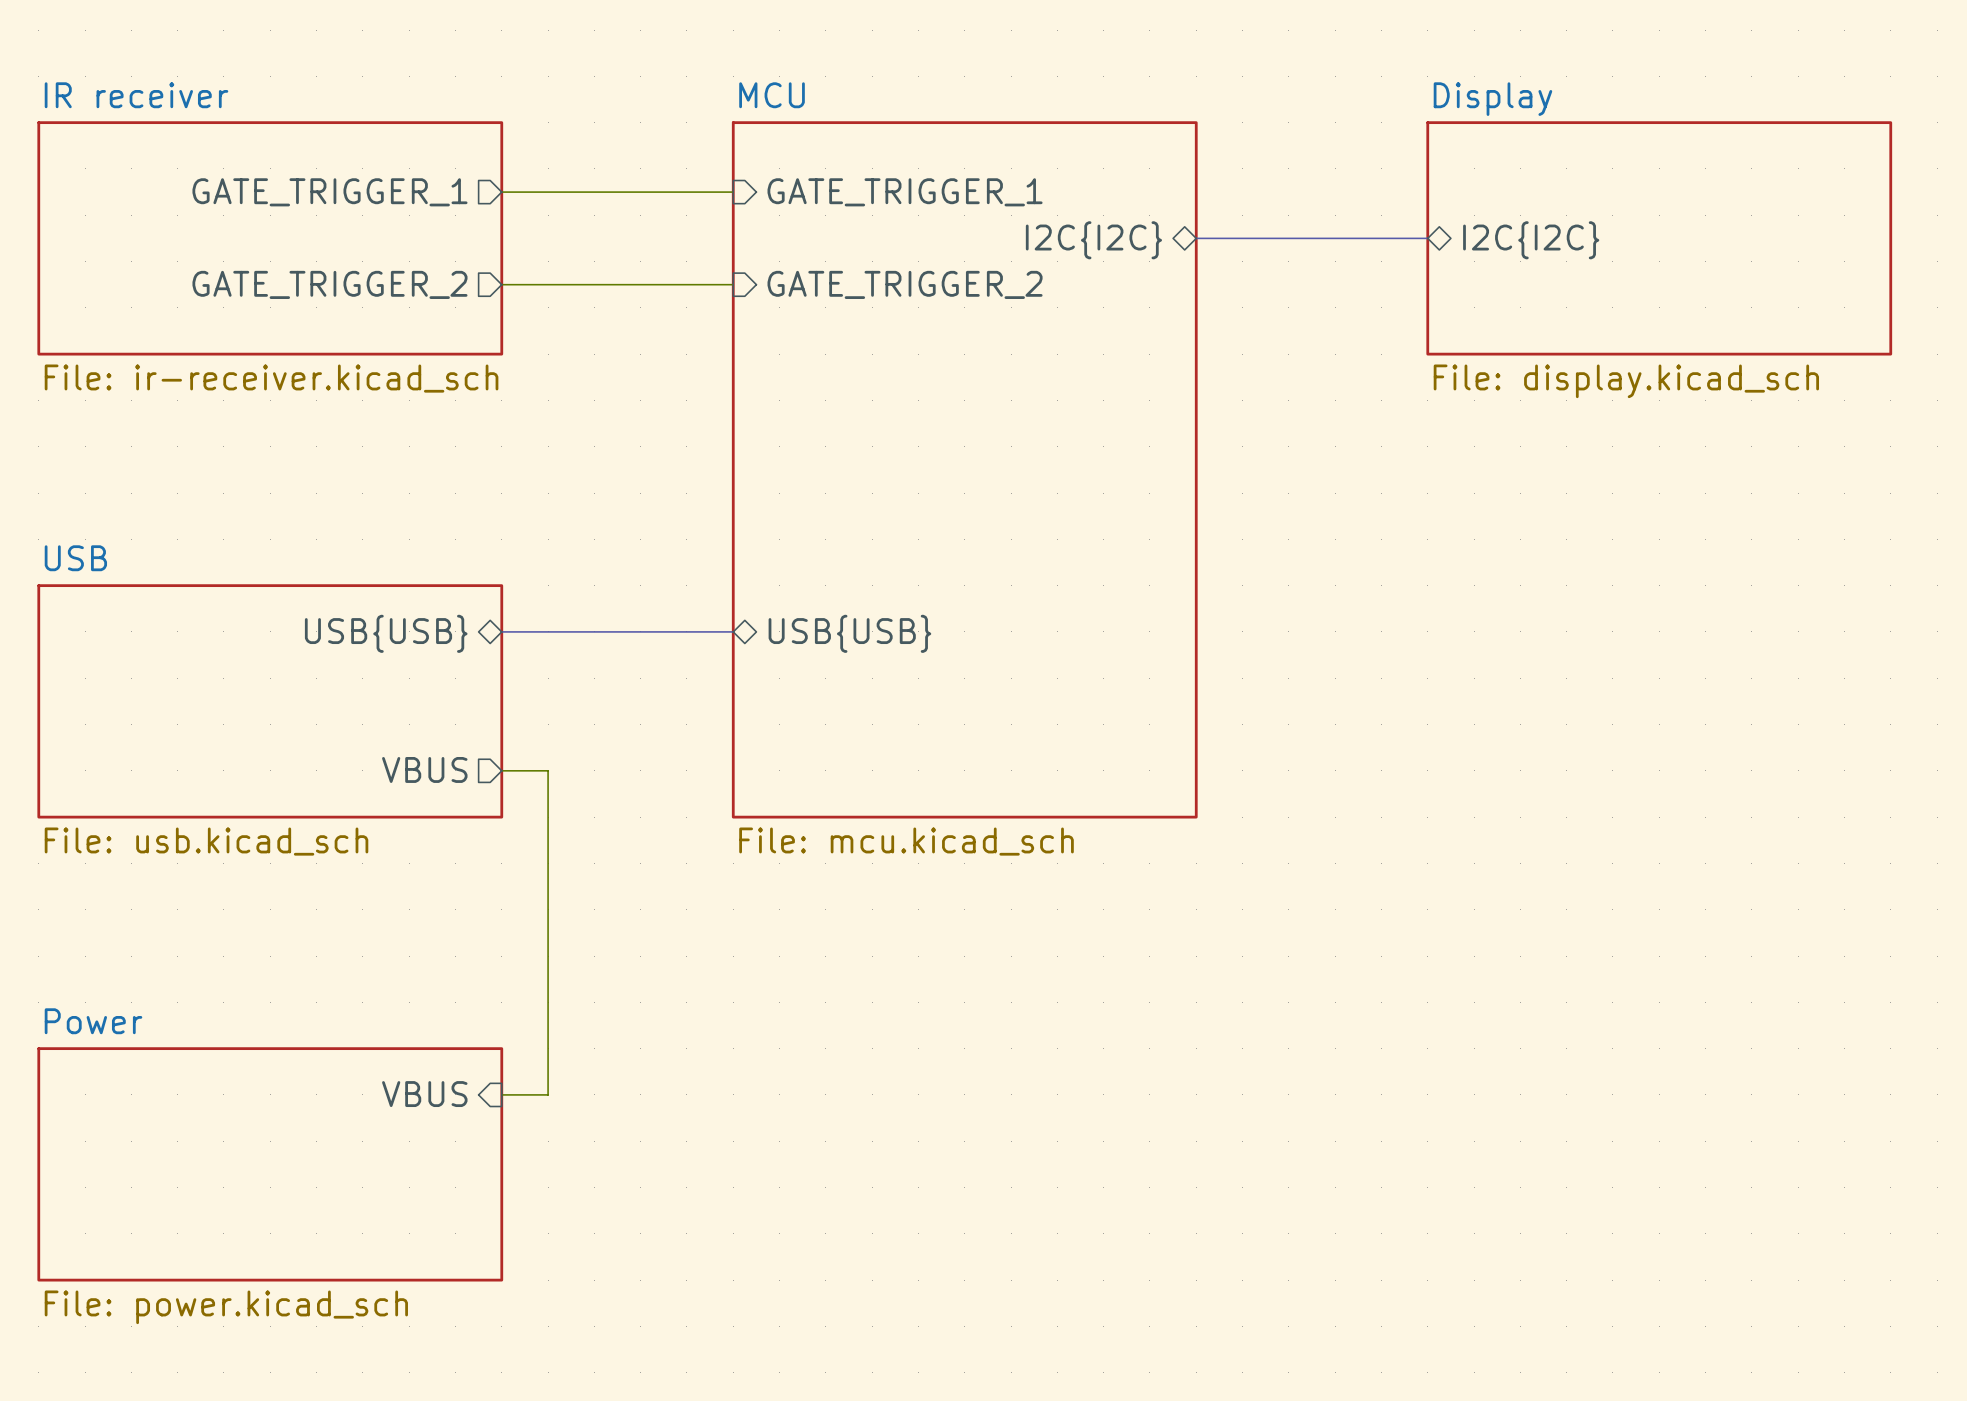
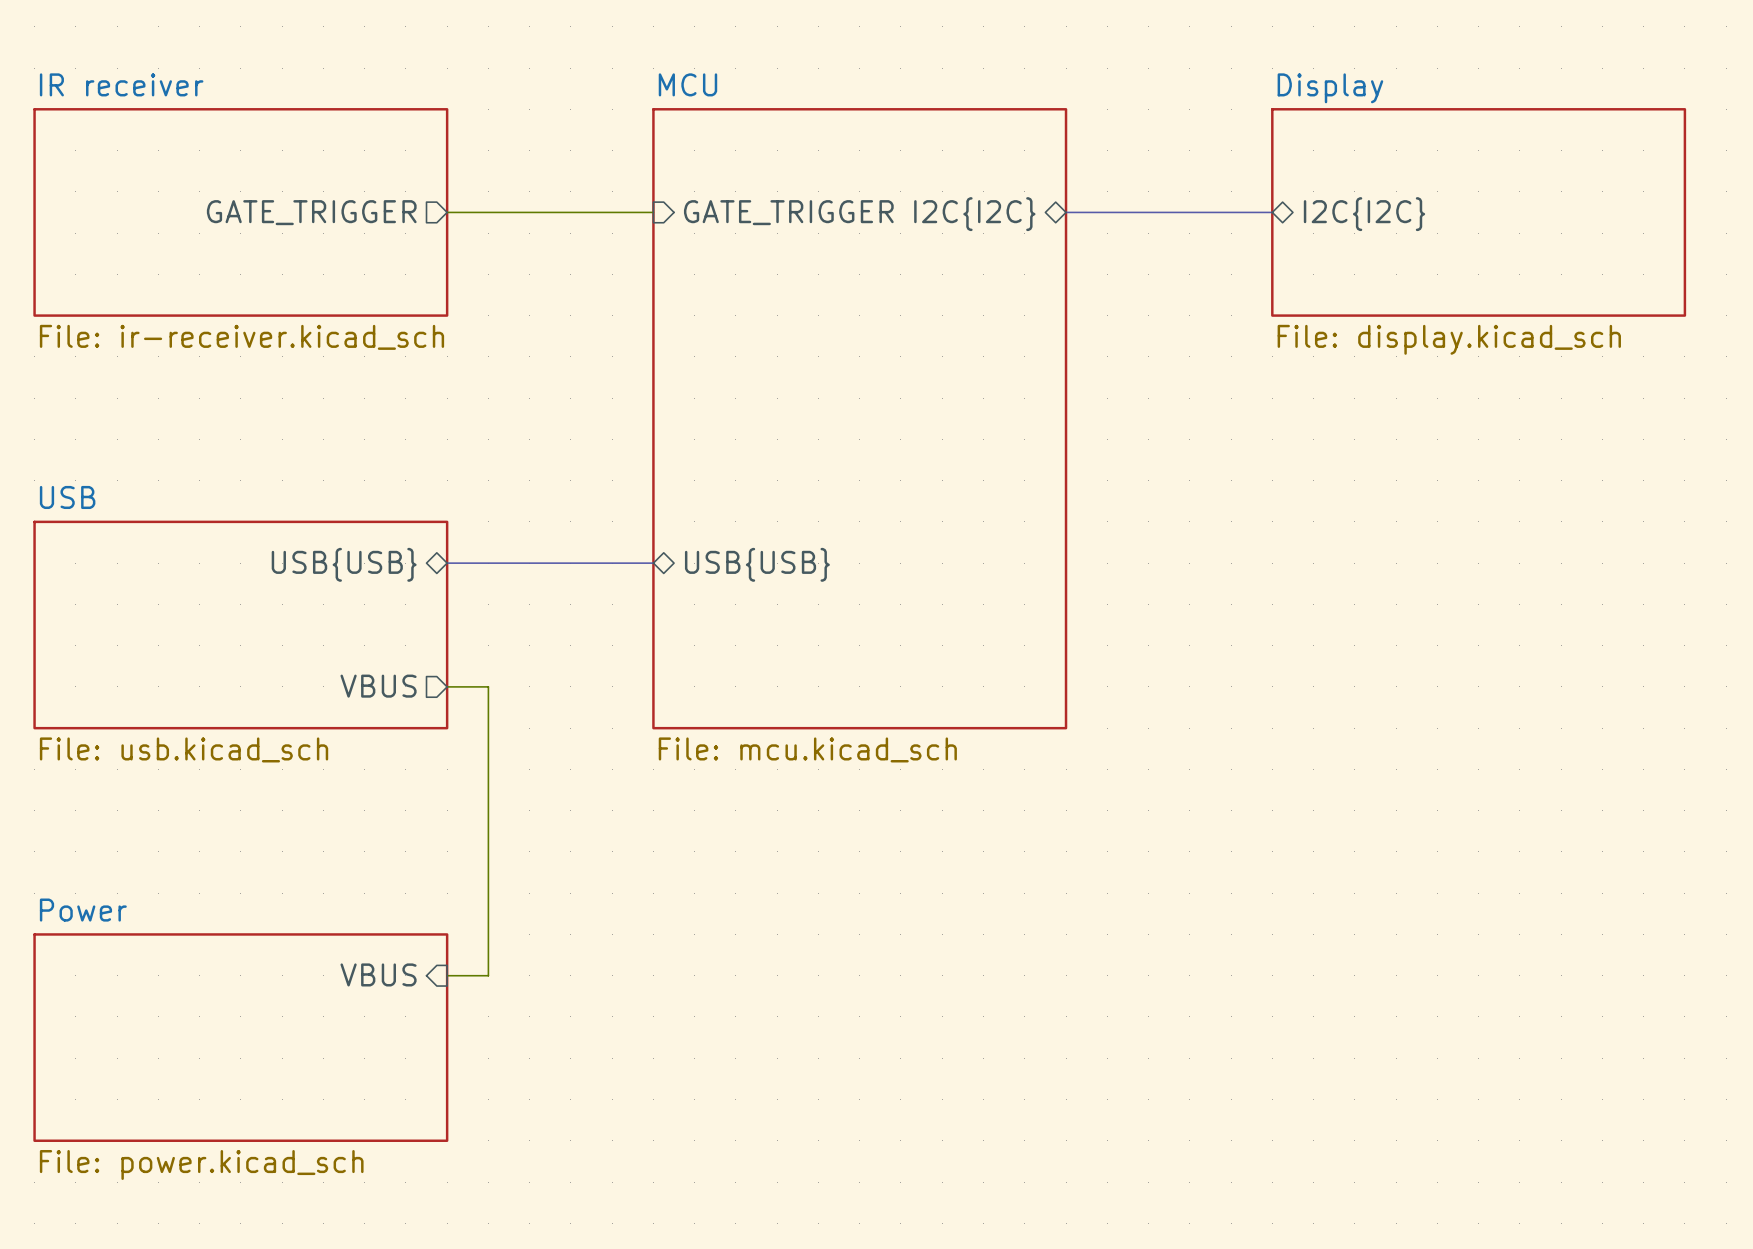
sheet pin: GATE_TRIGGER_1 (329, 192) -> none
wire: (501, 192) (733, 192) -> (447, 212) (653, 212)
sheet pin: GATE_TRIGGER_1 (905, 192) -> none
sheet pin: none -> GATE_TRIGGER (311, 212)
sheet pin: none -> GATE_TRIGGER (788, 212)
sheet pin: GATE_TRIGGER_2 (329, 284) -> none
wire: (501, 284) (733, 284) -> none
sheet pin: GATE_TRIGGER_2 (905, 284) -> none

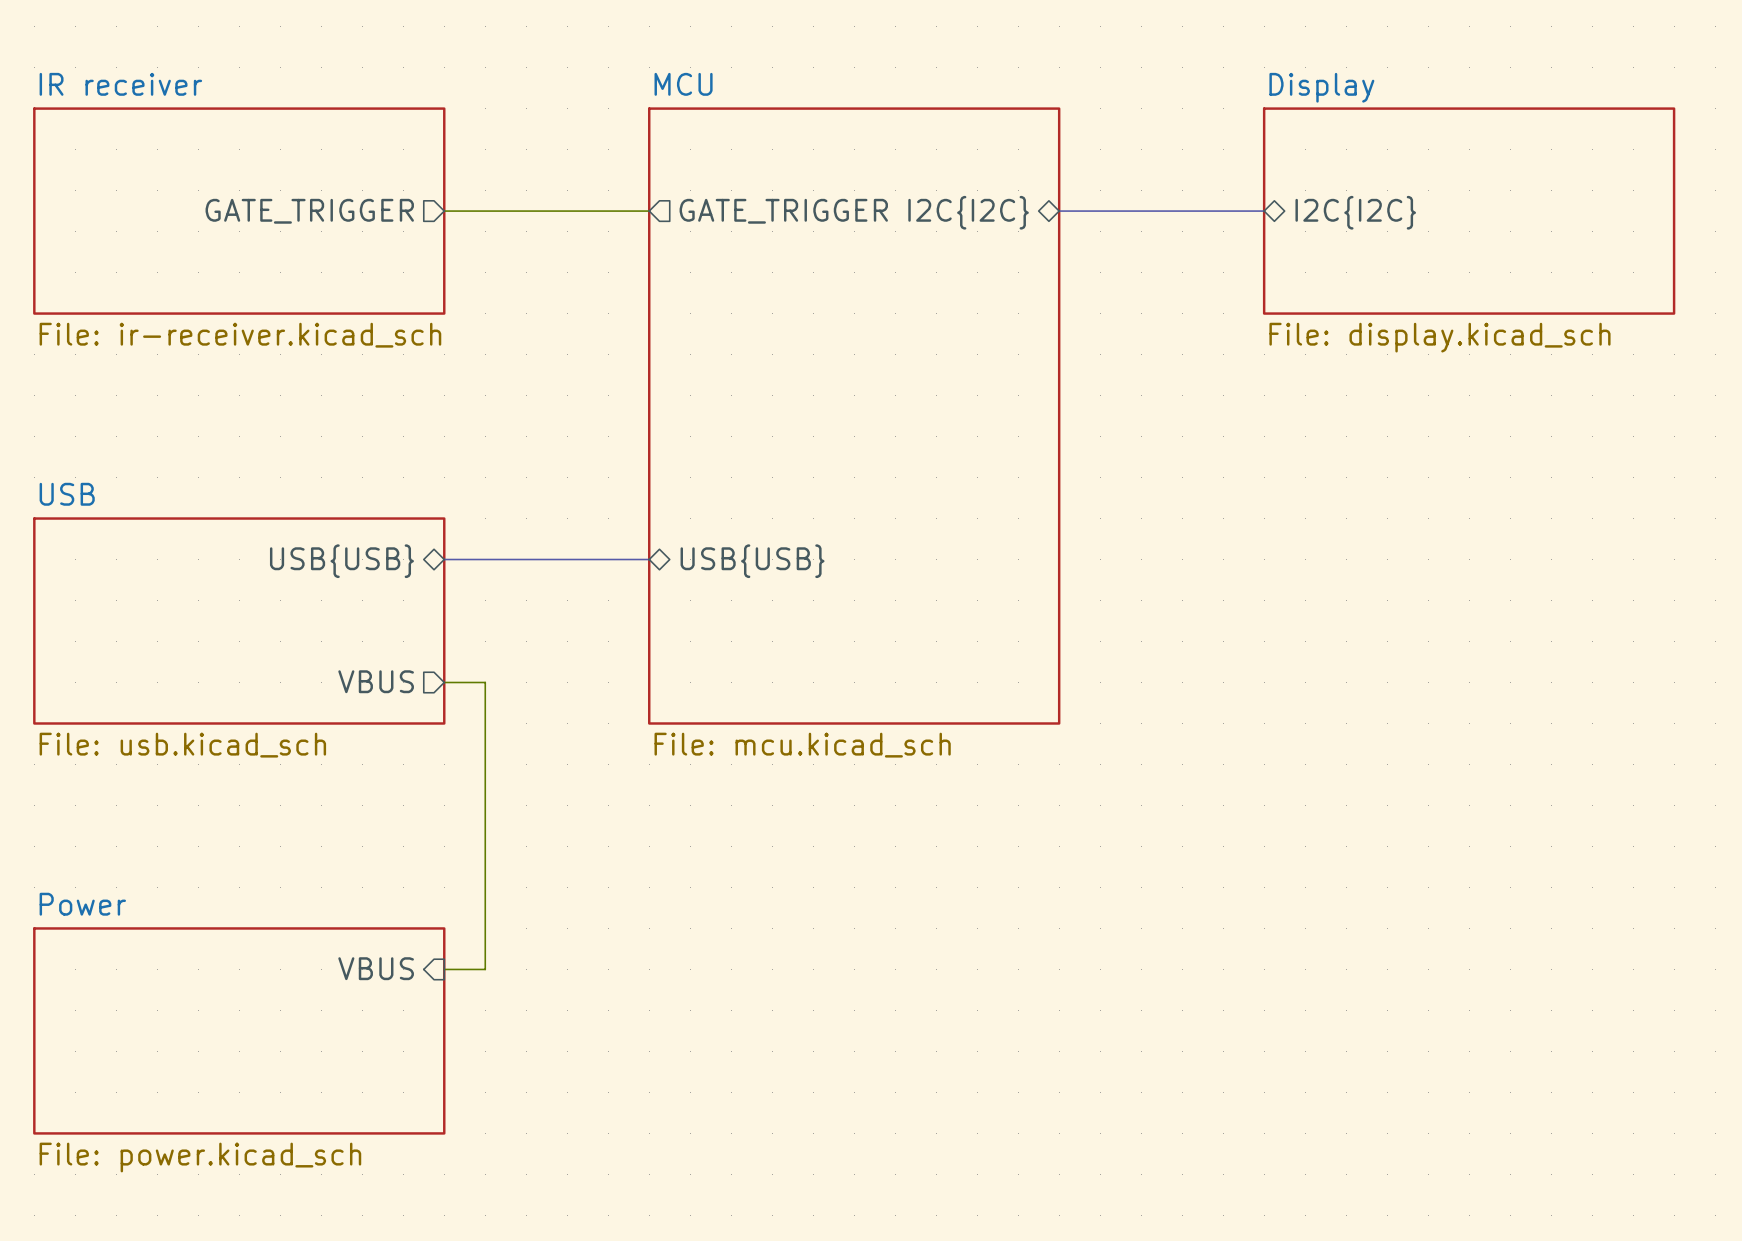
sheet pin shape: input (788, 212) -> output (783, 211)

